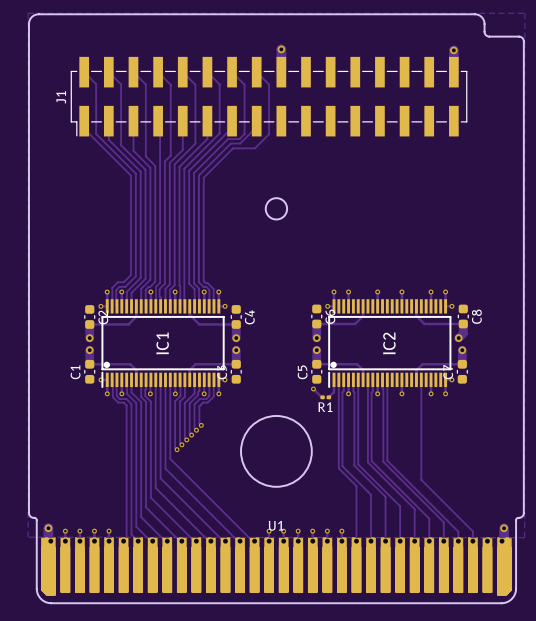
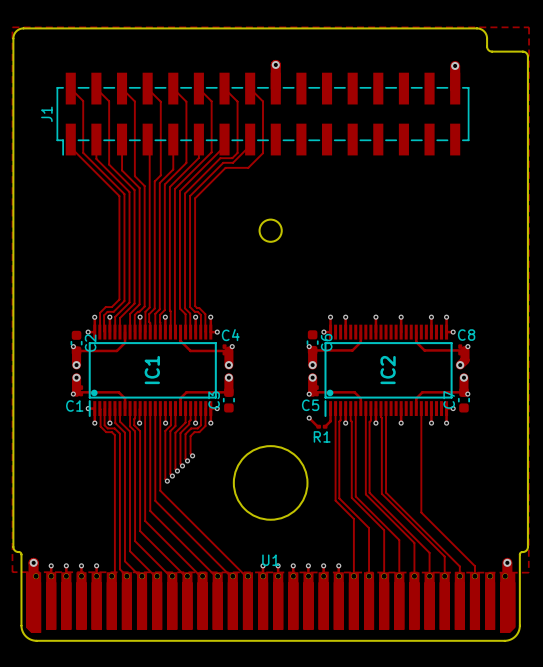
C8 footprint: [457, 304, 469, 329] -> [458, 344, 463, 356]
C4 footprint: [230, 305, 242, 329] -> [222, 344, 227, 356]
via: none -> (73, 346)
via: none -> (232, 346)
via: none -> (309, 346)
via: none -> (467, 346)
C1 footprint: [84, 359, 96, 384] -> [79, 385, 84, 397]
C5 footprint: [311, 359, 323, 384] -> [314, 385, 319, 397]
via: none -> (73, 394)
via: none -> (467, 394)
via: none -> (309, 394)

